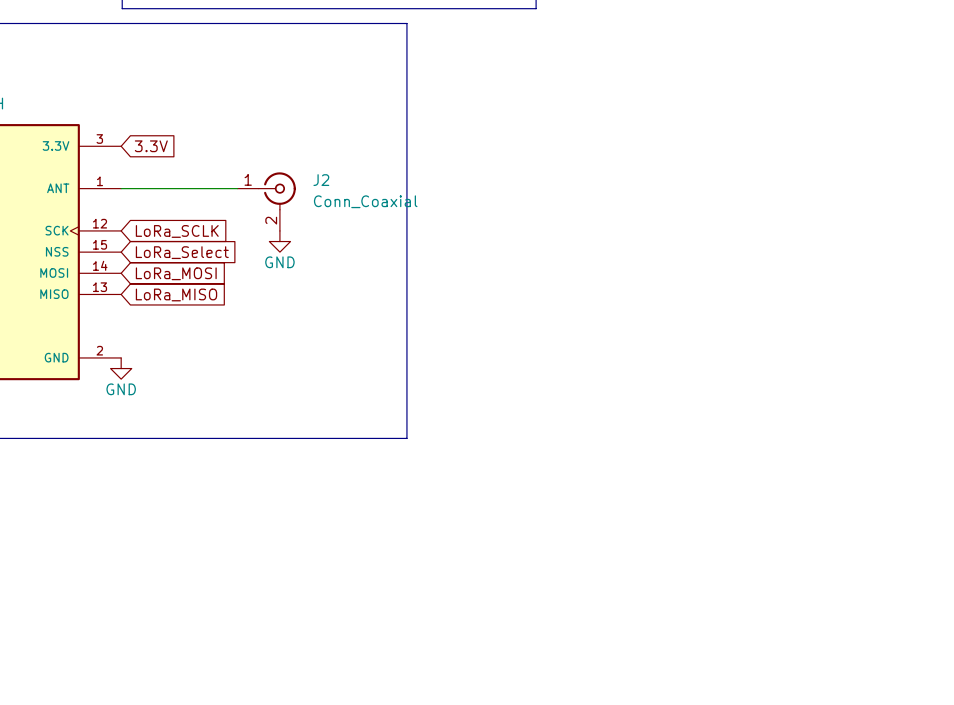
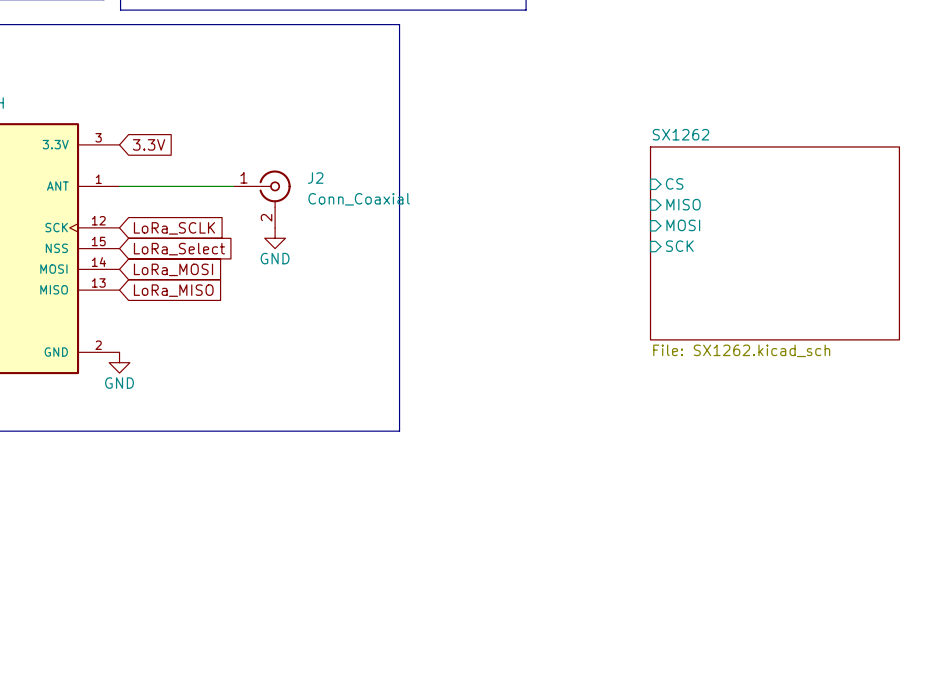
sheet pin: none -> CS (674, 183)
sheet pin: none -> MISO (683, 204)
sheet pin: none -> MOSI (683, 225)
sheet SX1262: none -> File: SX1262.kicad_sch (774, 243)
sheet pin: none -> SCK (679, 246)

